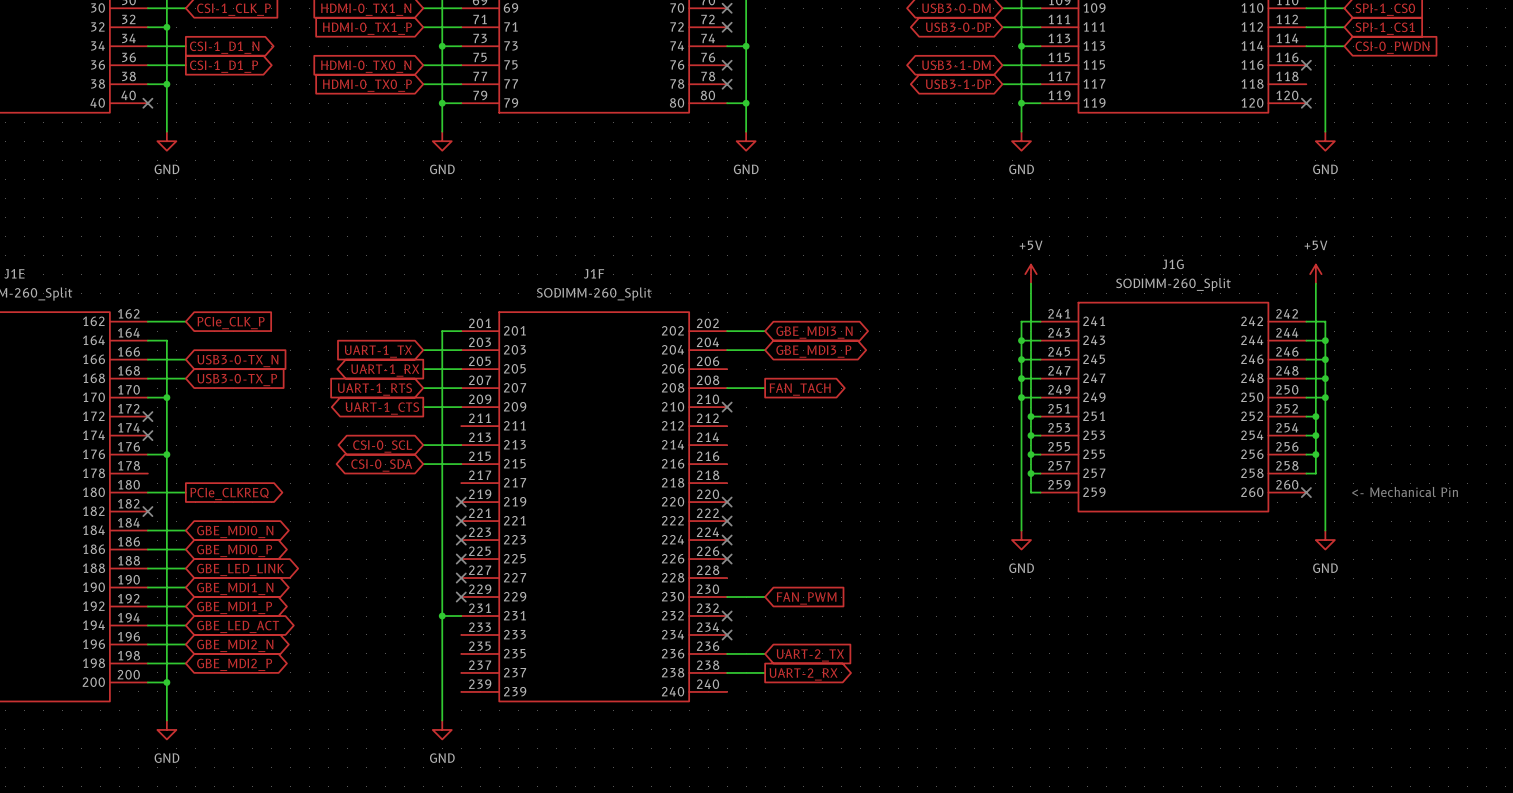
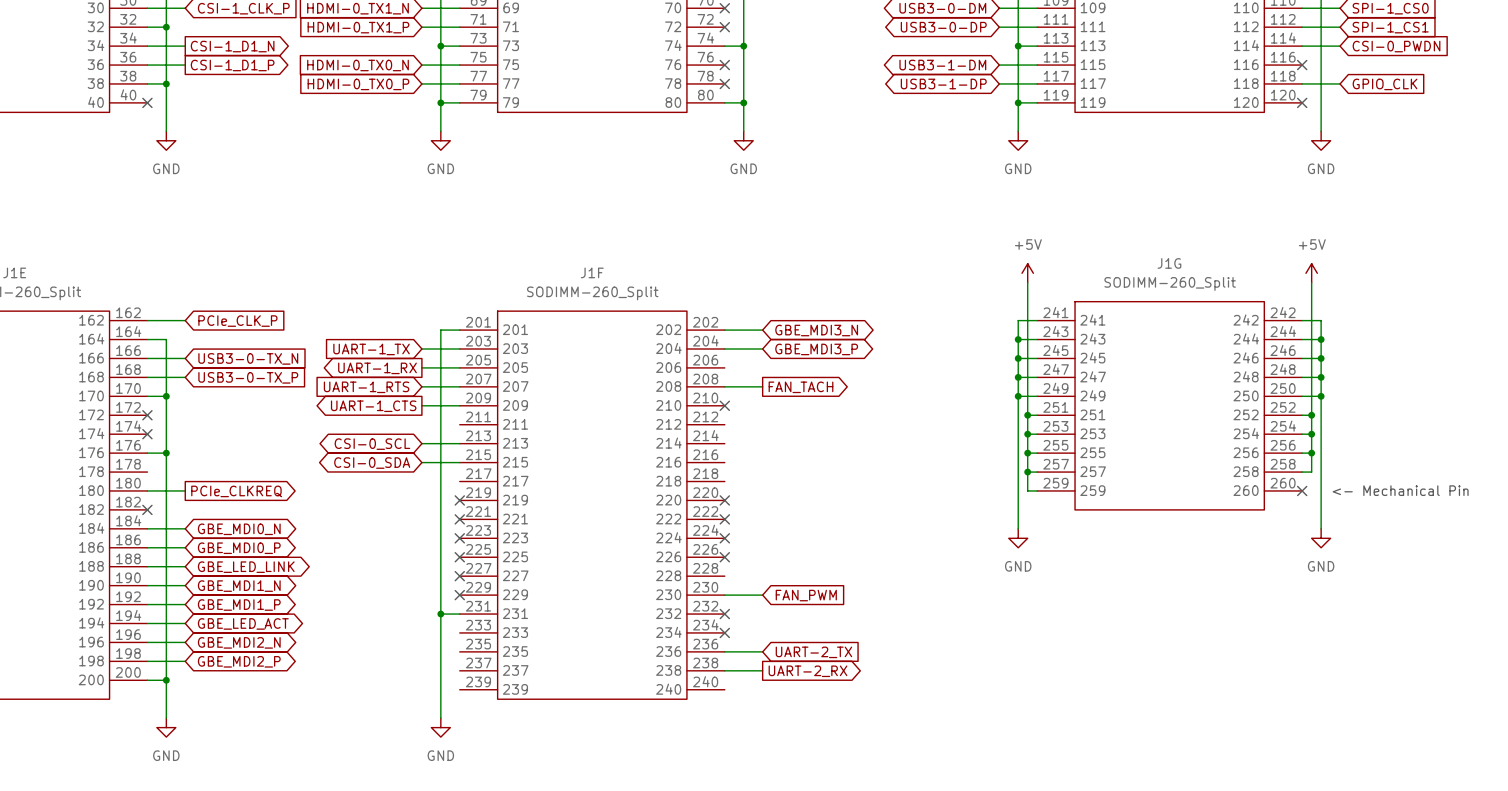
wire: none -> (1302, 83) (1340, 83)
global label: none -> GPIO_CLK (1385, 84)

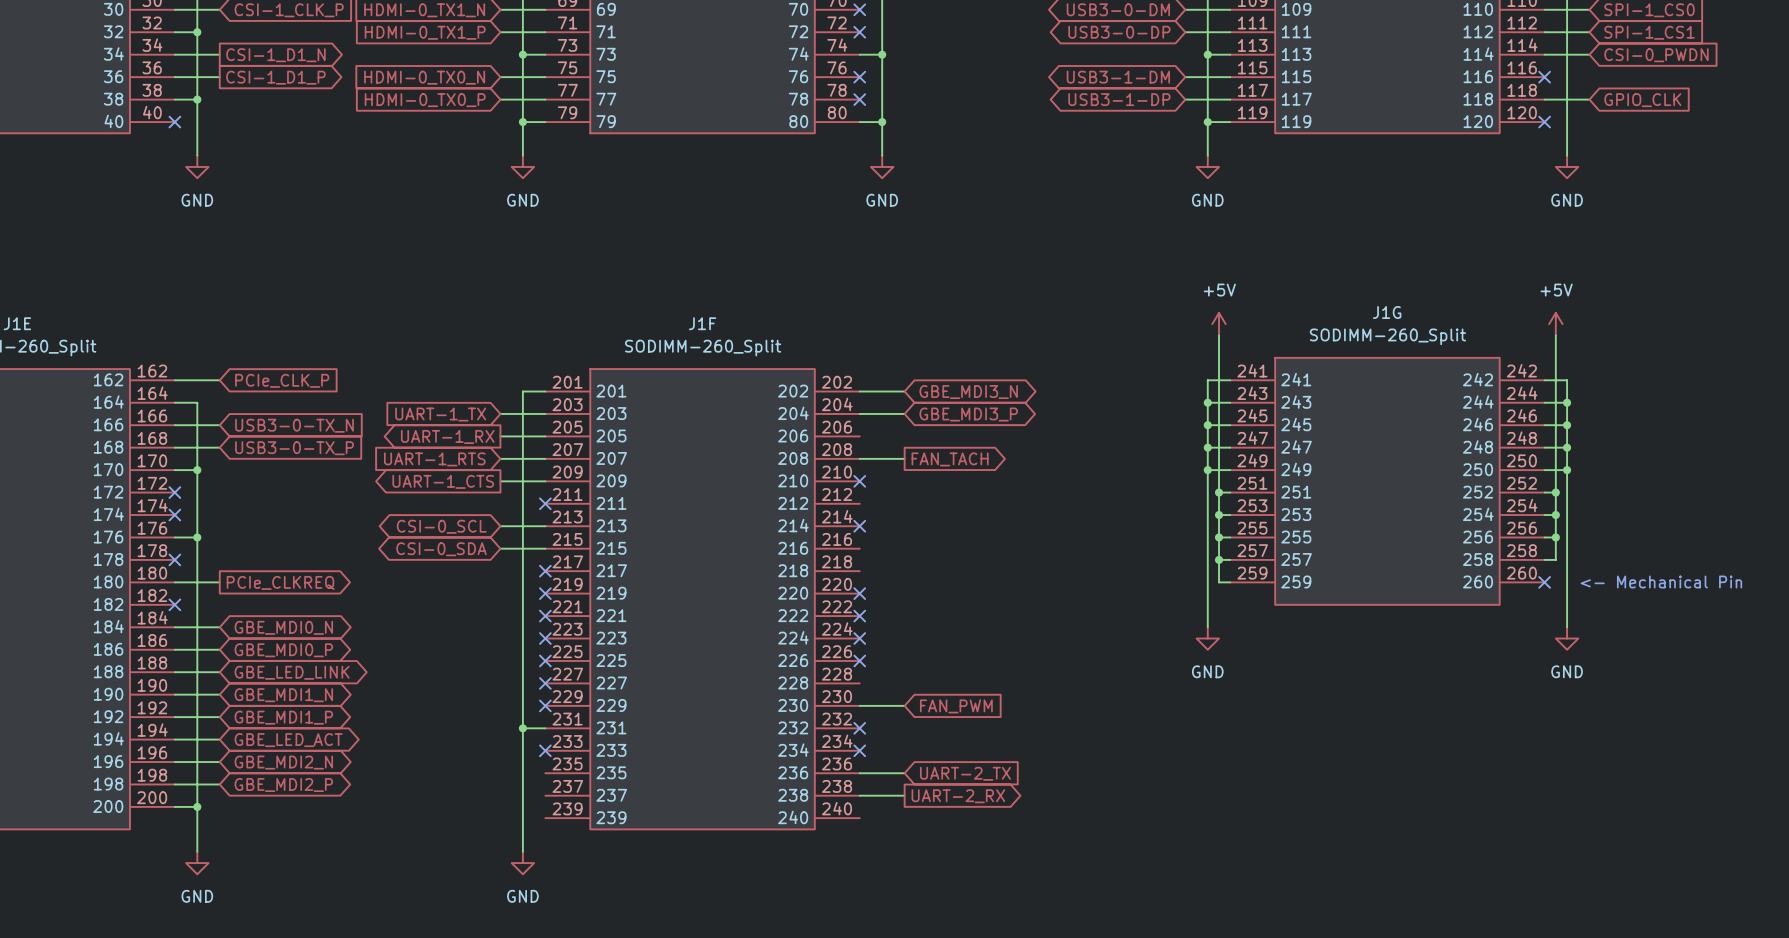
no-connect mark: none -> (545, 503)
no-connect mark: none -> (859, 526)
no-connect mark: none -> (174, 559)
no-connect mark: none -> (545, 571)
no-connect mark: none -> (545, 750)

